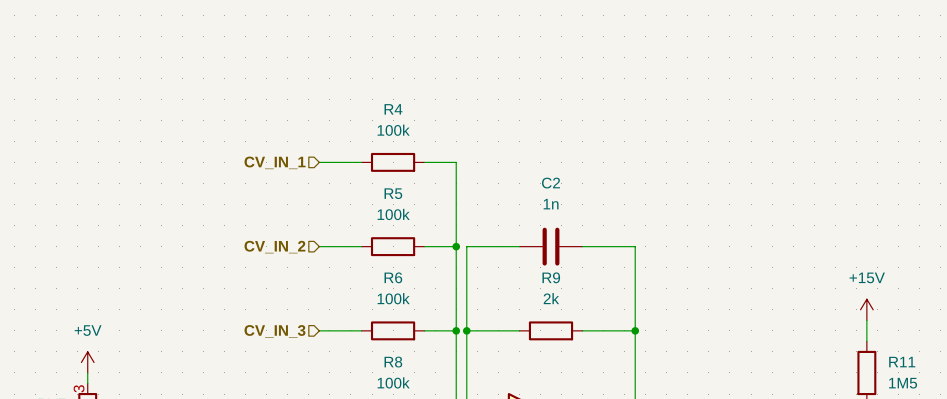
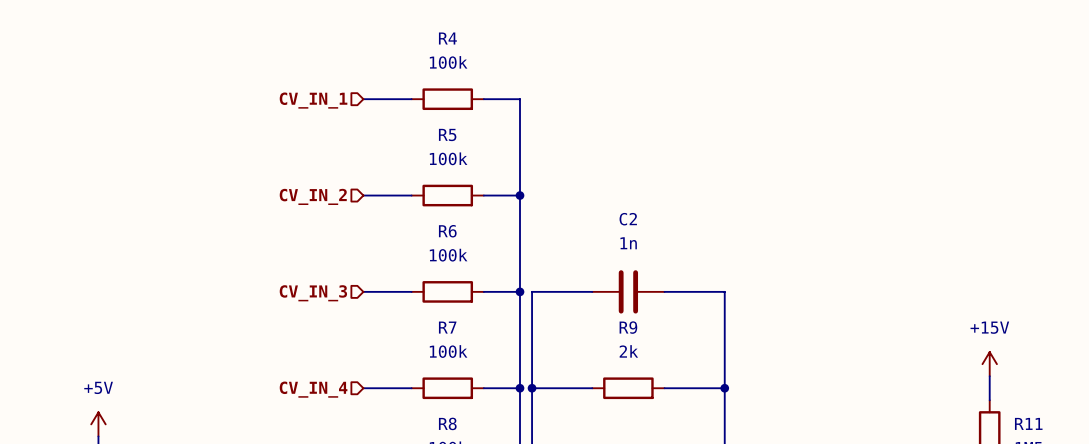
hierarchical label: none -> CV_IN_1 (313, 100)
wire: none -> (363, 99) (411, 99)
R4: none -> 100k (447, 99)
wire: none -> (483, 99) (519, 99) (519, 195)
R4 name: R4 (393, 109) -> R5 (447, 134)
hierarchical label: CV_IN_1 (275, 162) -> CV_IN_2 (313, 196)
junction: none -> (519, 195)
R5 name: R5 (393, 193) -> R6 (447, 231)
hierarchical label: CV_IN_2 (274, 247) -> CV_IN_3 (313, 293)
R6 name: R6 (393, 277) -> R7 (447, 327)
hierarchical label: CV_IN_3 (274, 331) -> CV_IN_4 (313, 389)

